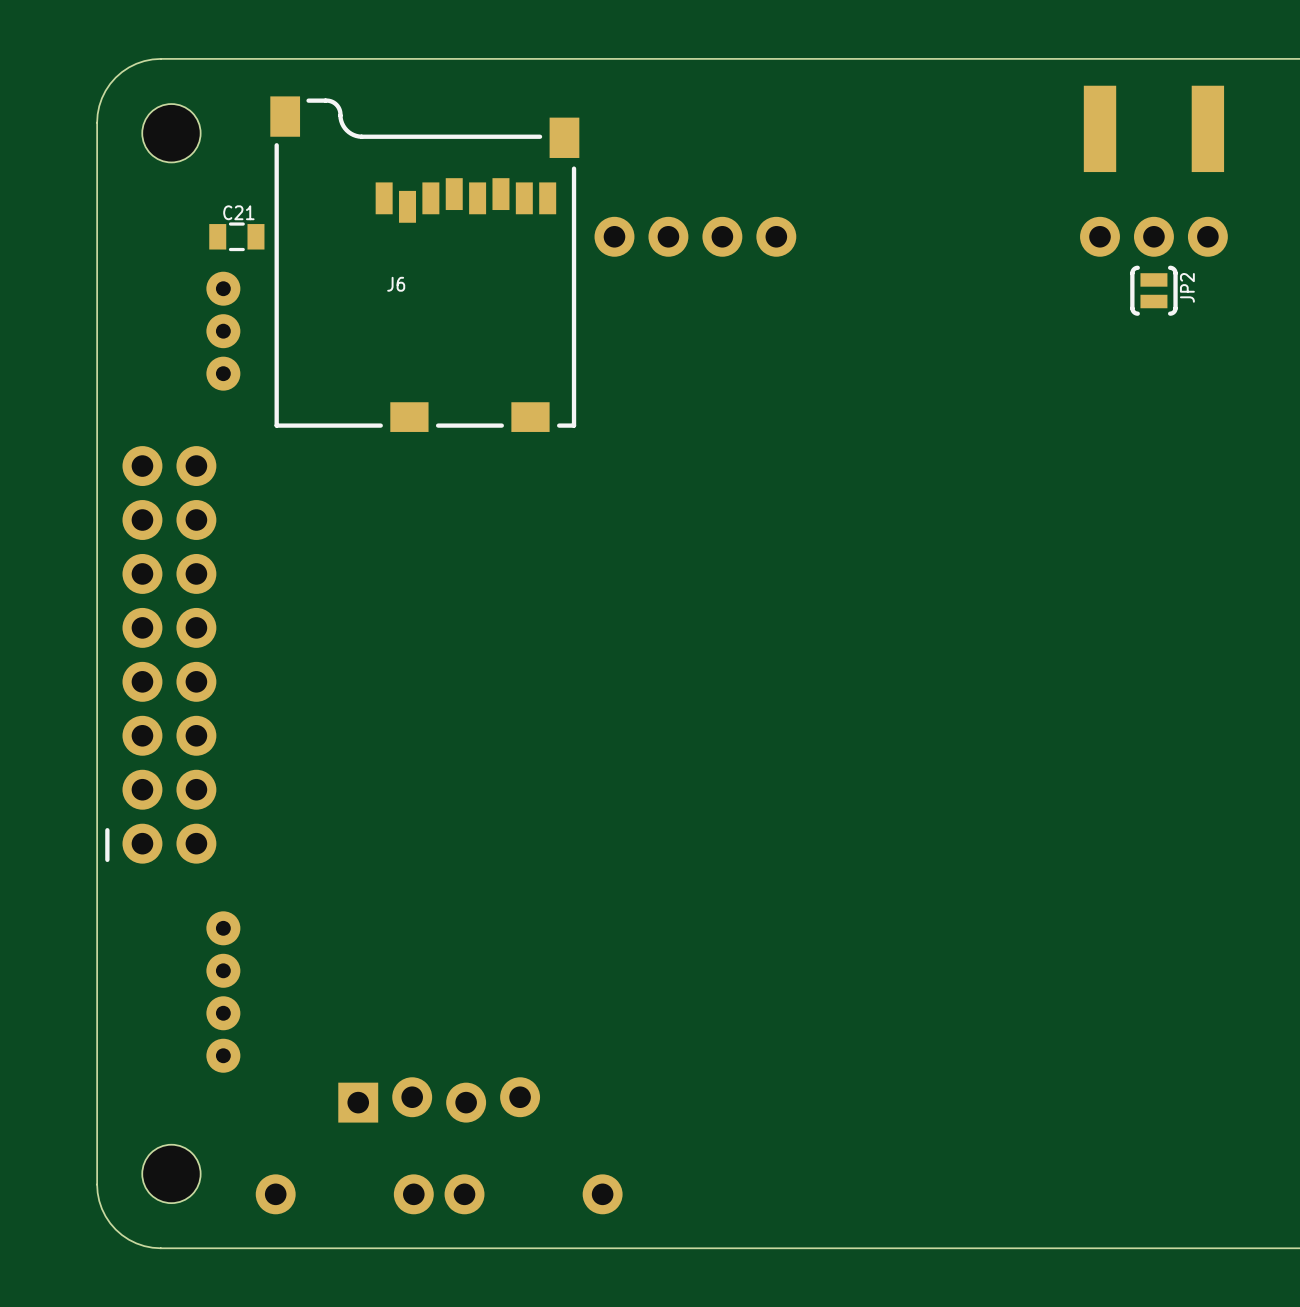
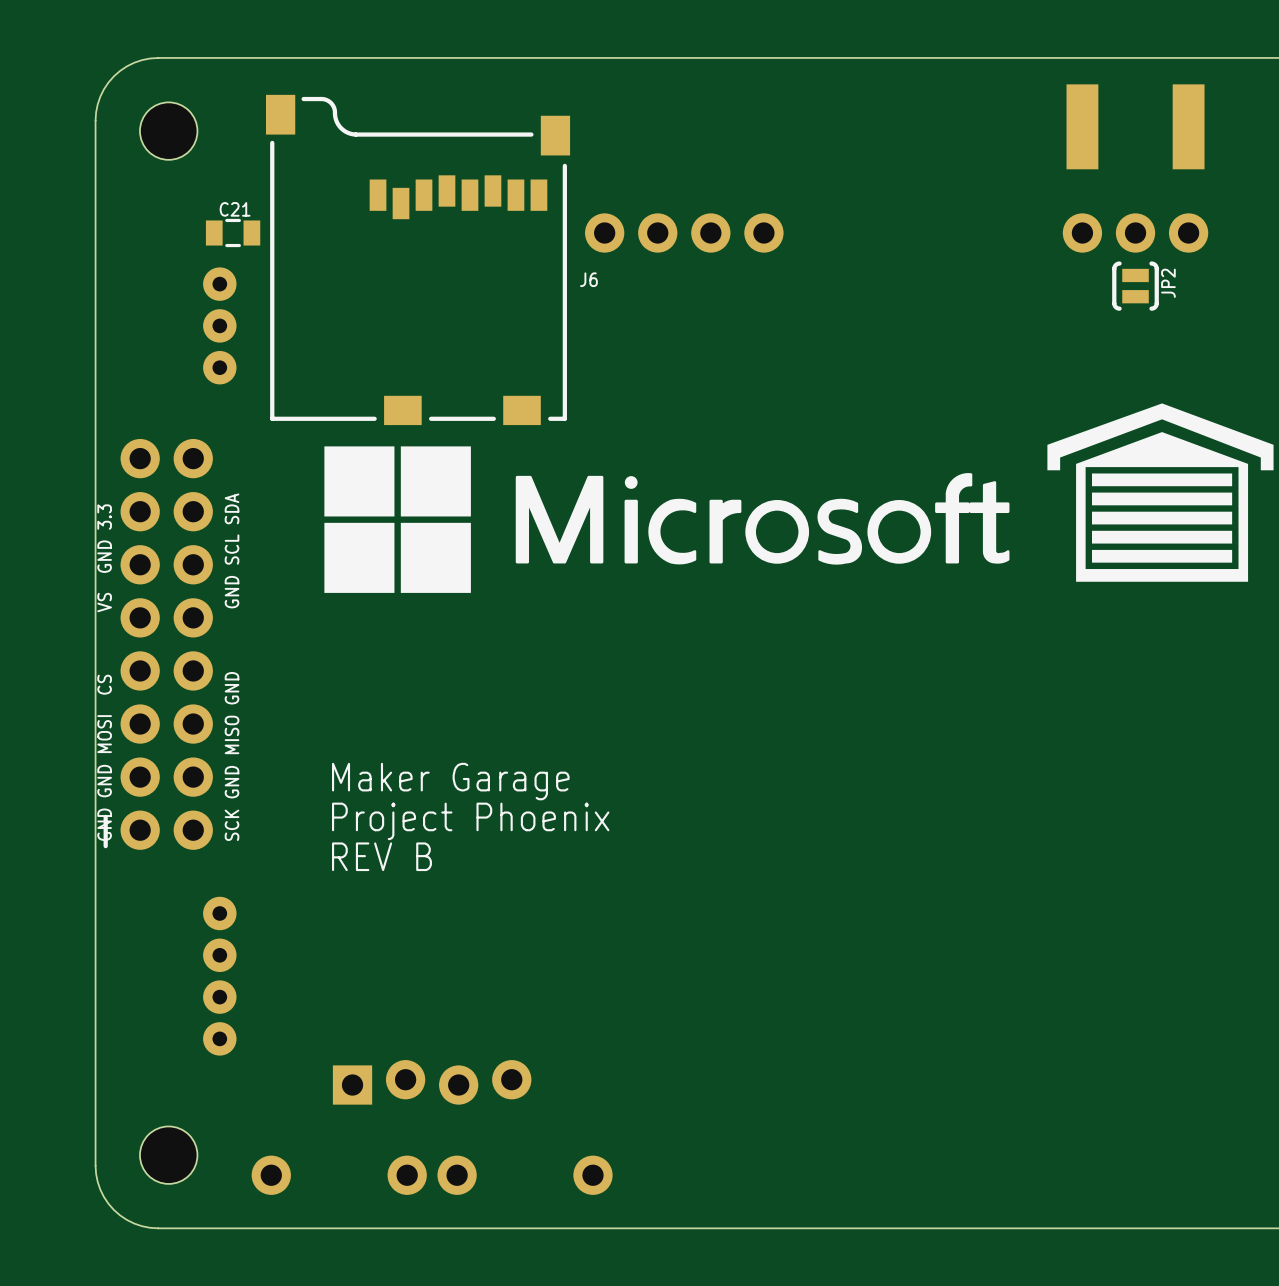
J6 name position: J6 (396, 284) -> J6 (588, 279)
drawing: none -> [1047, 403, 1274, 582]
drawing: none -> [324, 446, 1010, 593]
text: none -> SCK GND MISO GND GND SCL SDA (232, 667)
text: none -> GND GND MOSI CS VS GND 3.3 (104, 672)
text: none -> Maker Garage (450, 781)
text: none -> Project Phoenix (470, 821)
text: none -> REV B (381, 856)

